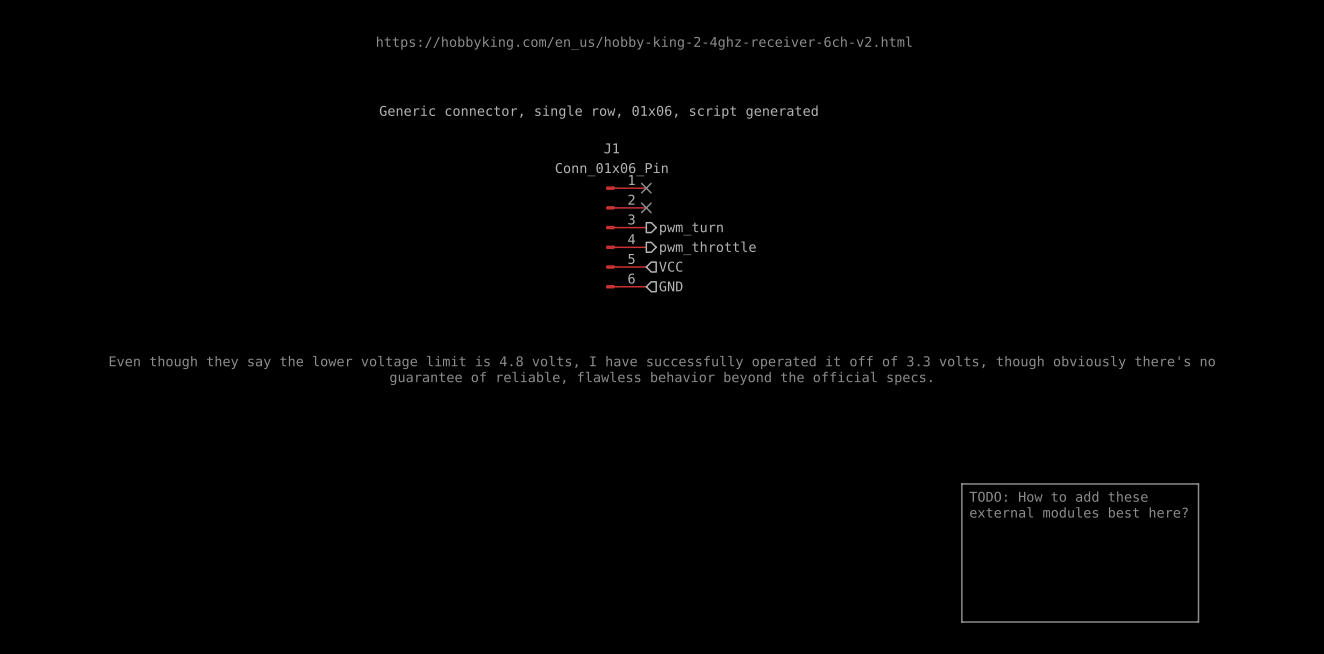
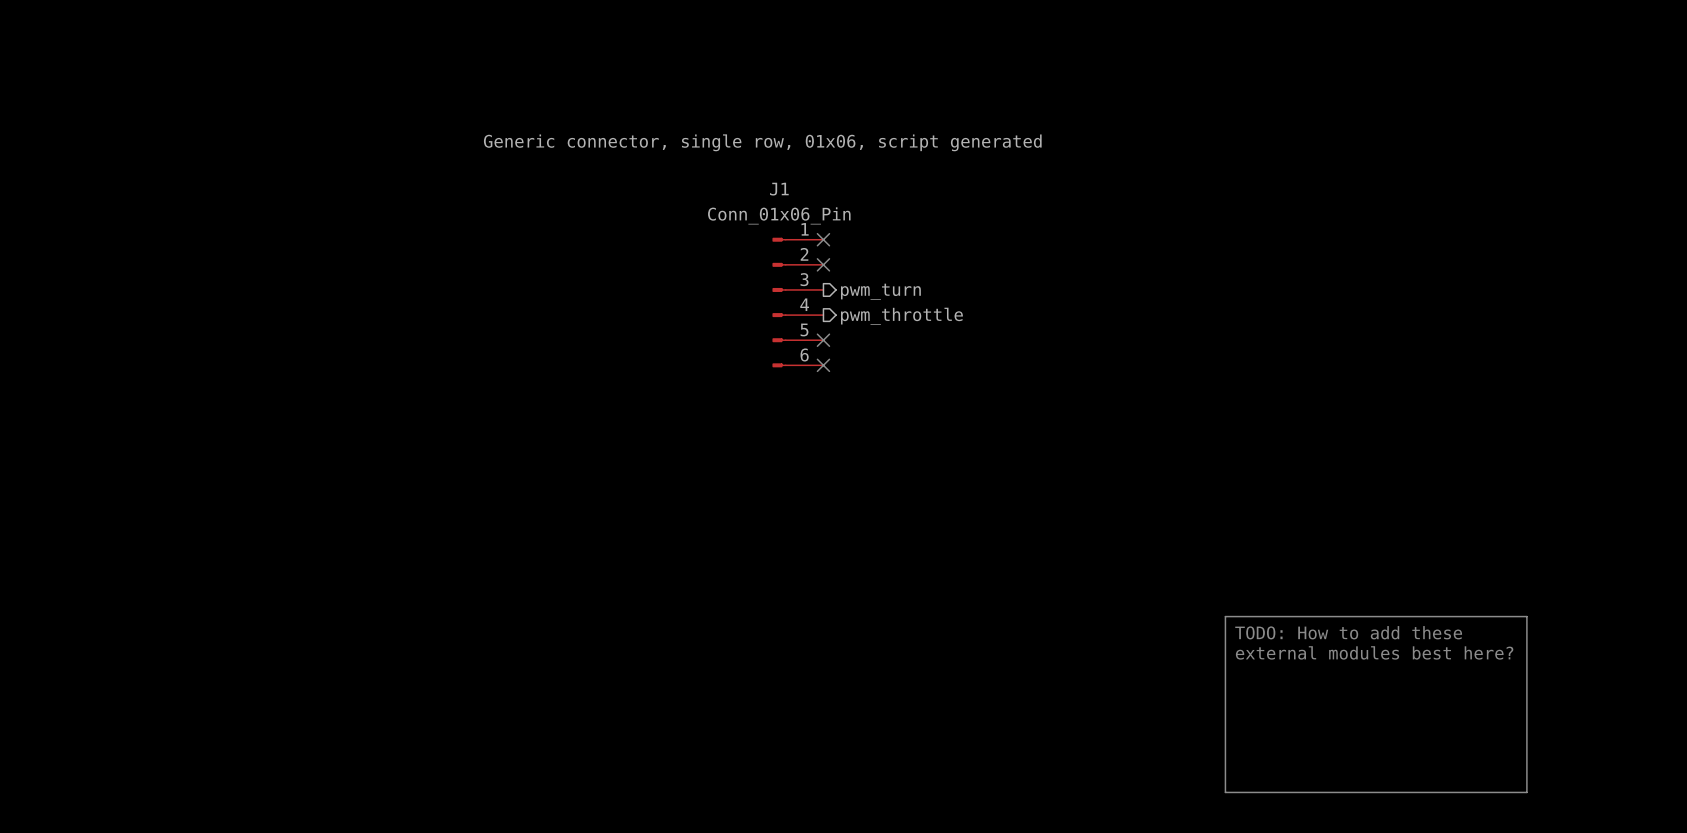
text: https://hobbyking.com/en_us/hobby-king-2-4ghz-receiver-6ch-v2.html (644, 43) -> none
hierarchical label: VCC (670, 266) -> none
no-connect mark: none -> (823, 340)
no-connect mark: none -> (823, 365)
hierarchical label: GND (670, 286) -> none
text: Even though they say the lower voltage limit is 4.8 volts, I have successfully operated it off of 3.3 volts, though obviously there's no (662, 362) -> none
text: guarantee of reliable, flawless behavior beyond the official specs. (660, 378) -> none

